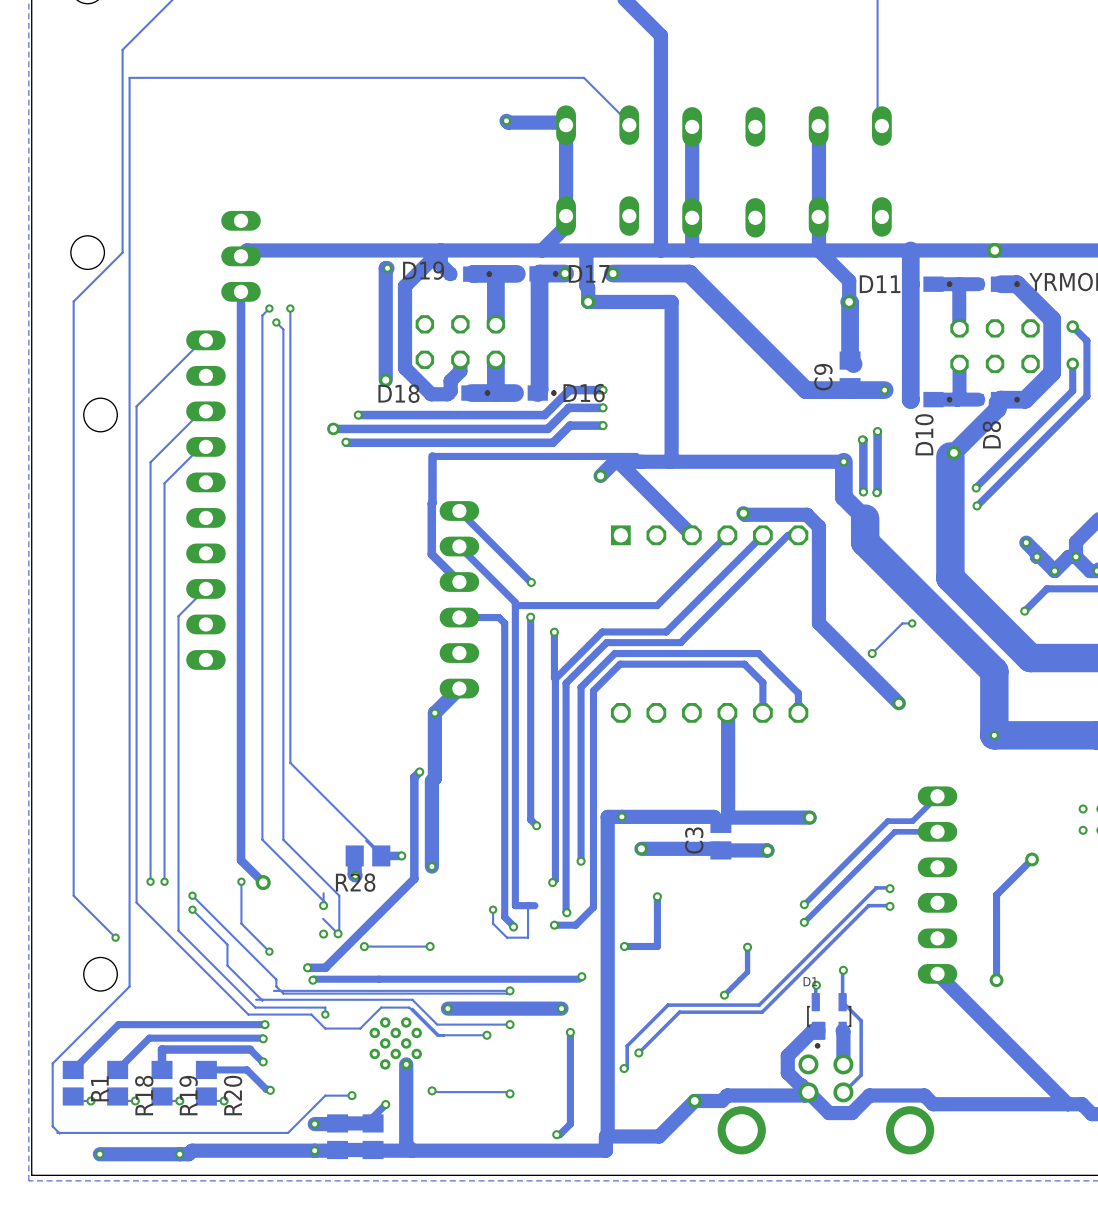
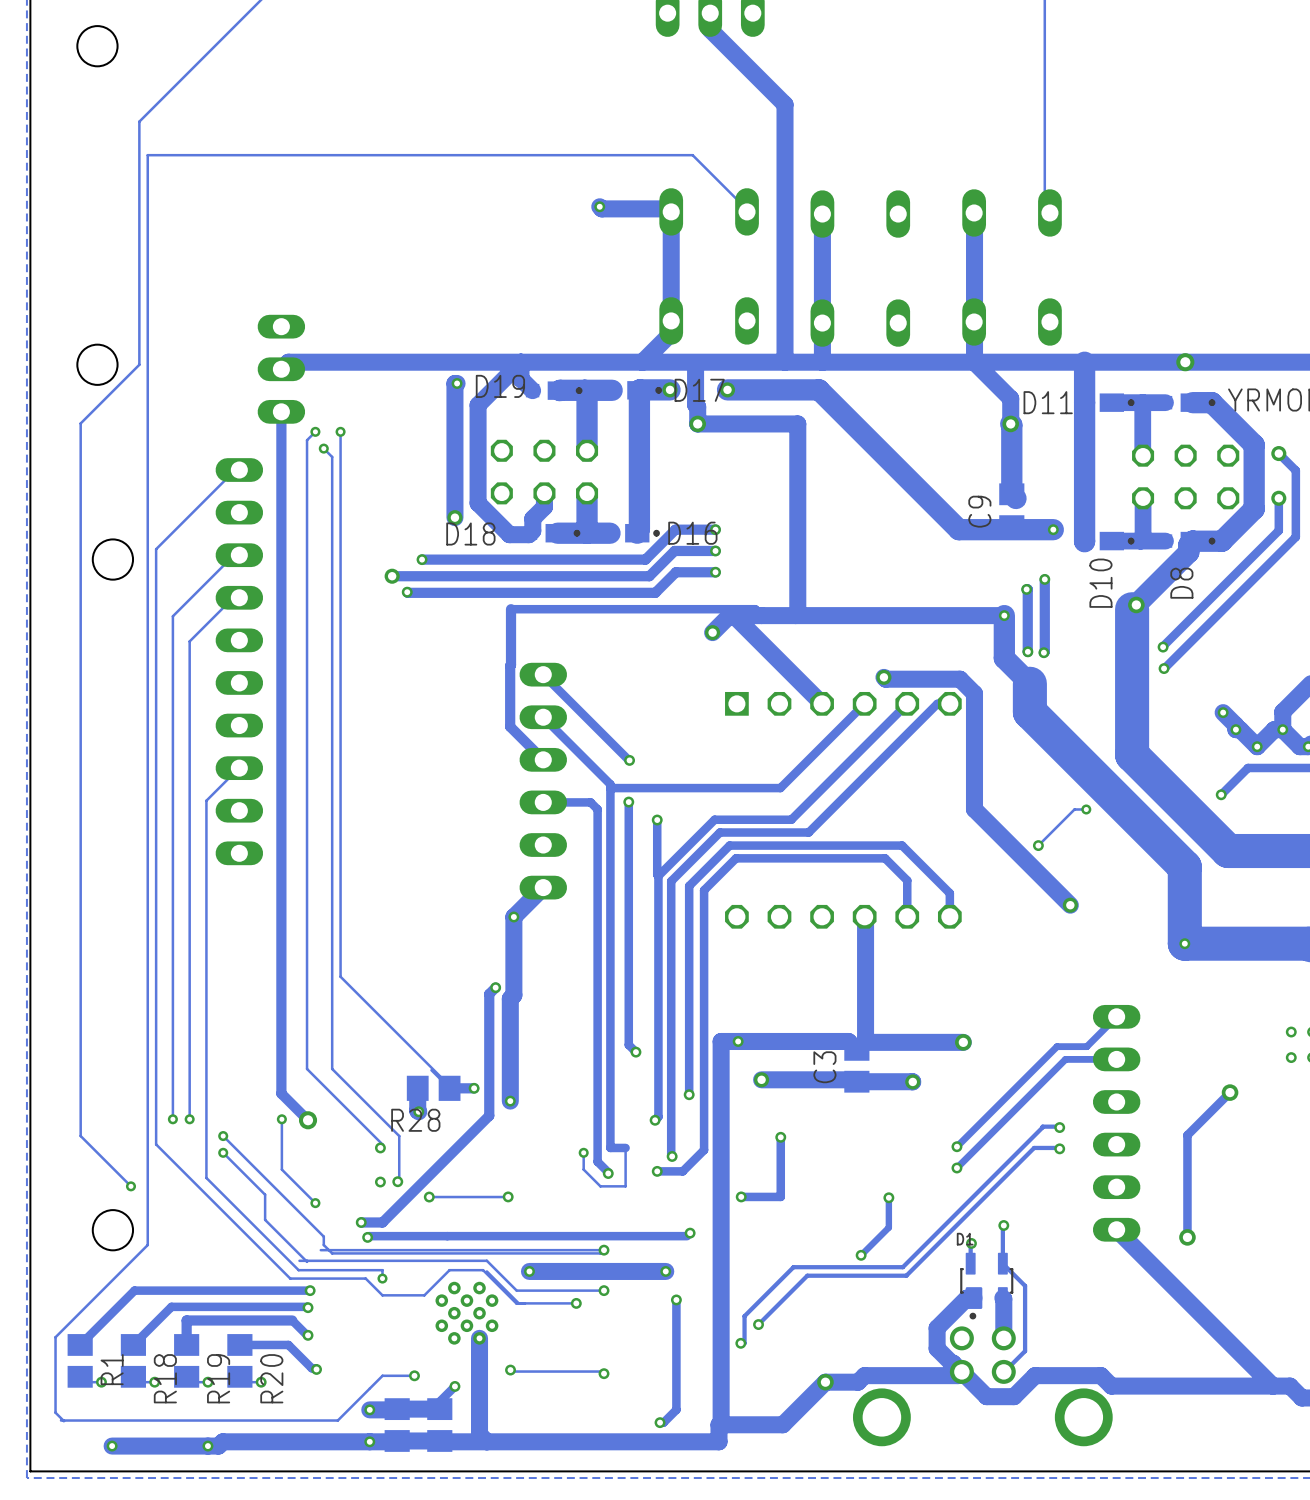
track: (323, 893) (323, 905) -> none
track: (528, 902) (528, 905) (534, 905) -> none
track: (323, 918) (338, 933) -> none

